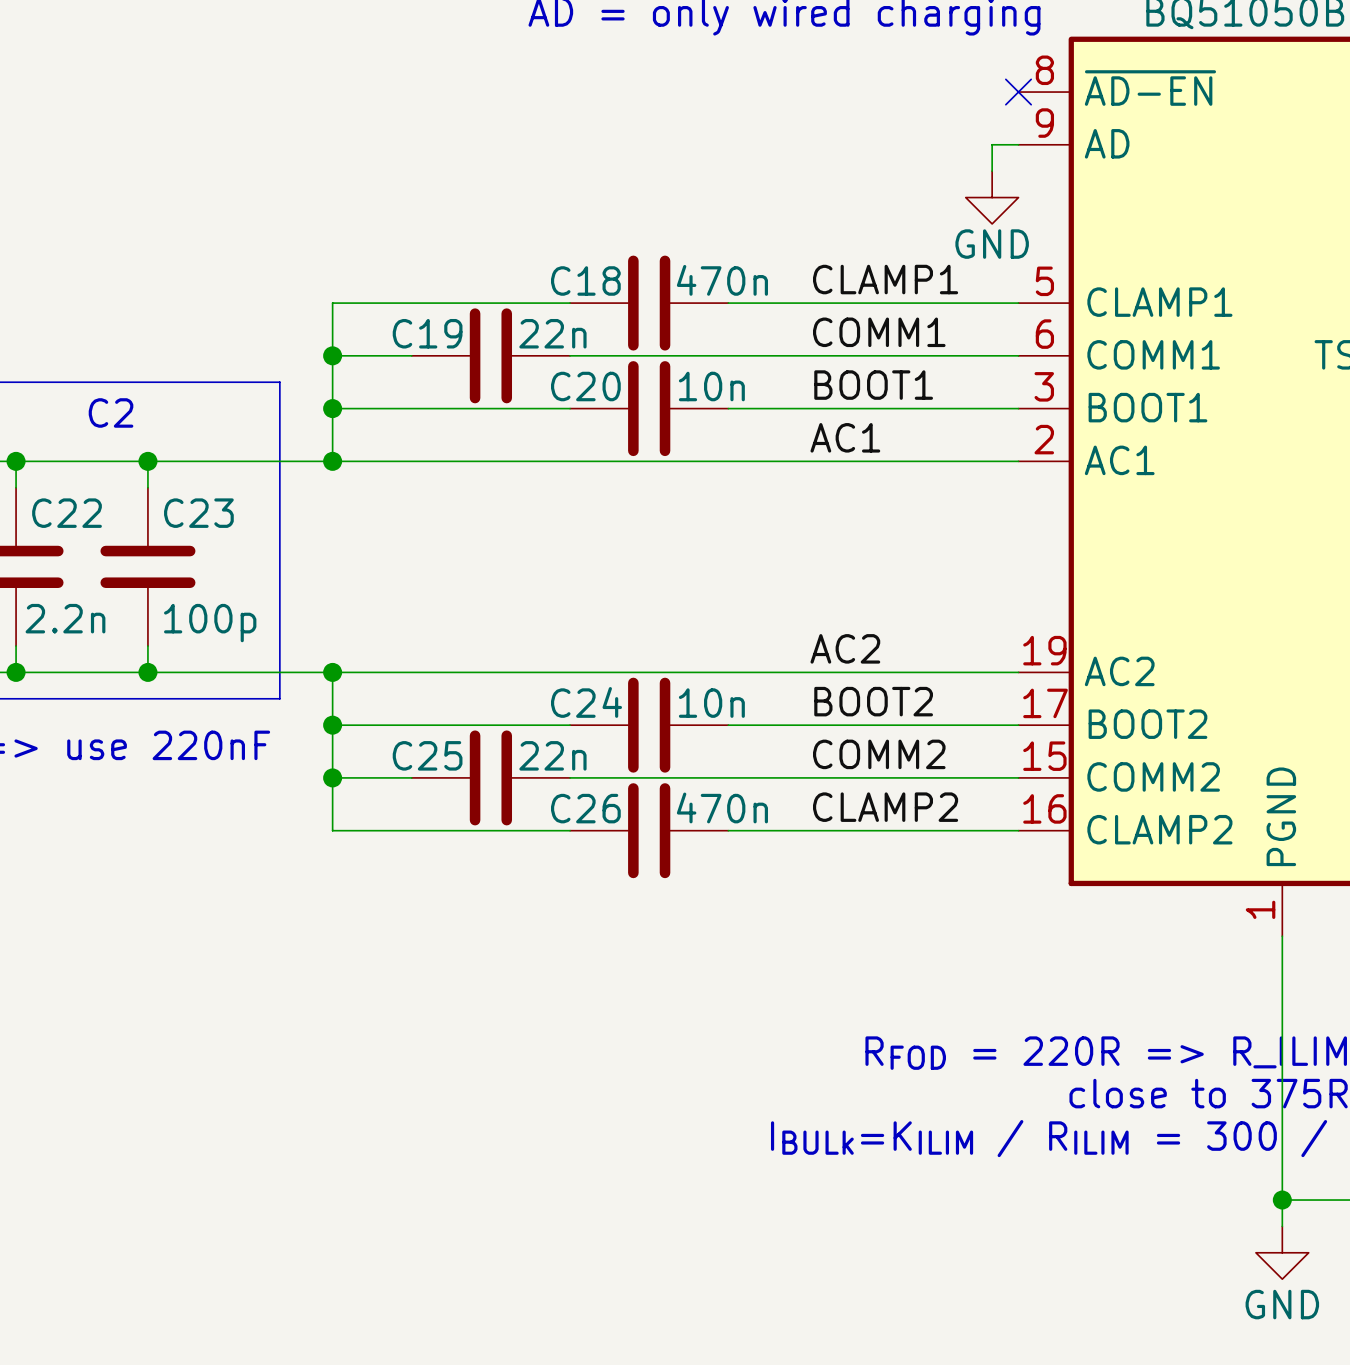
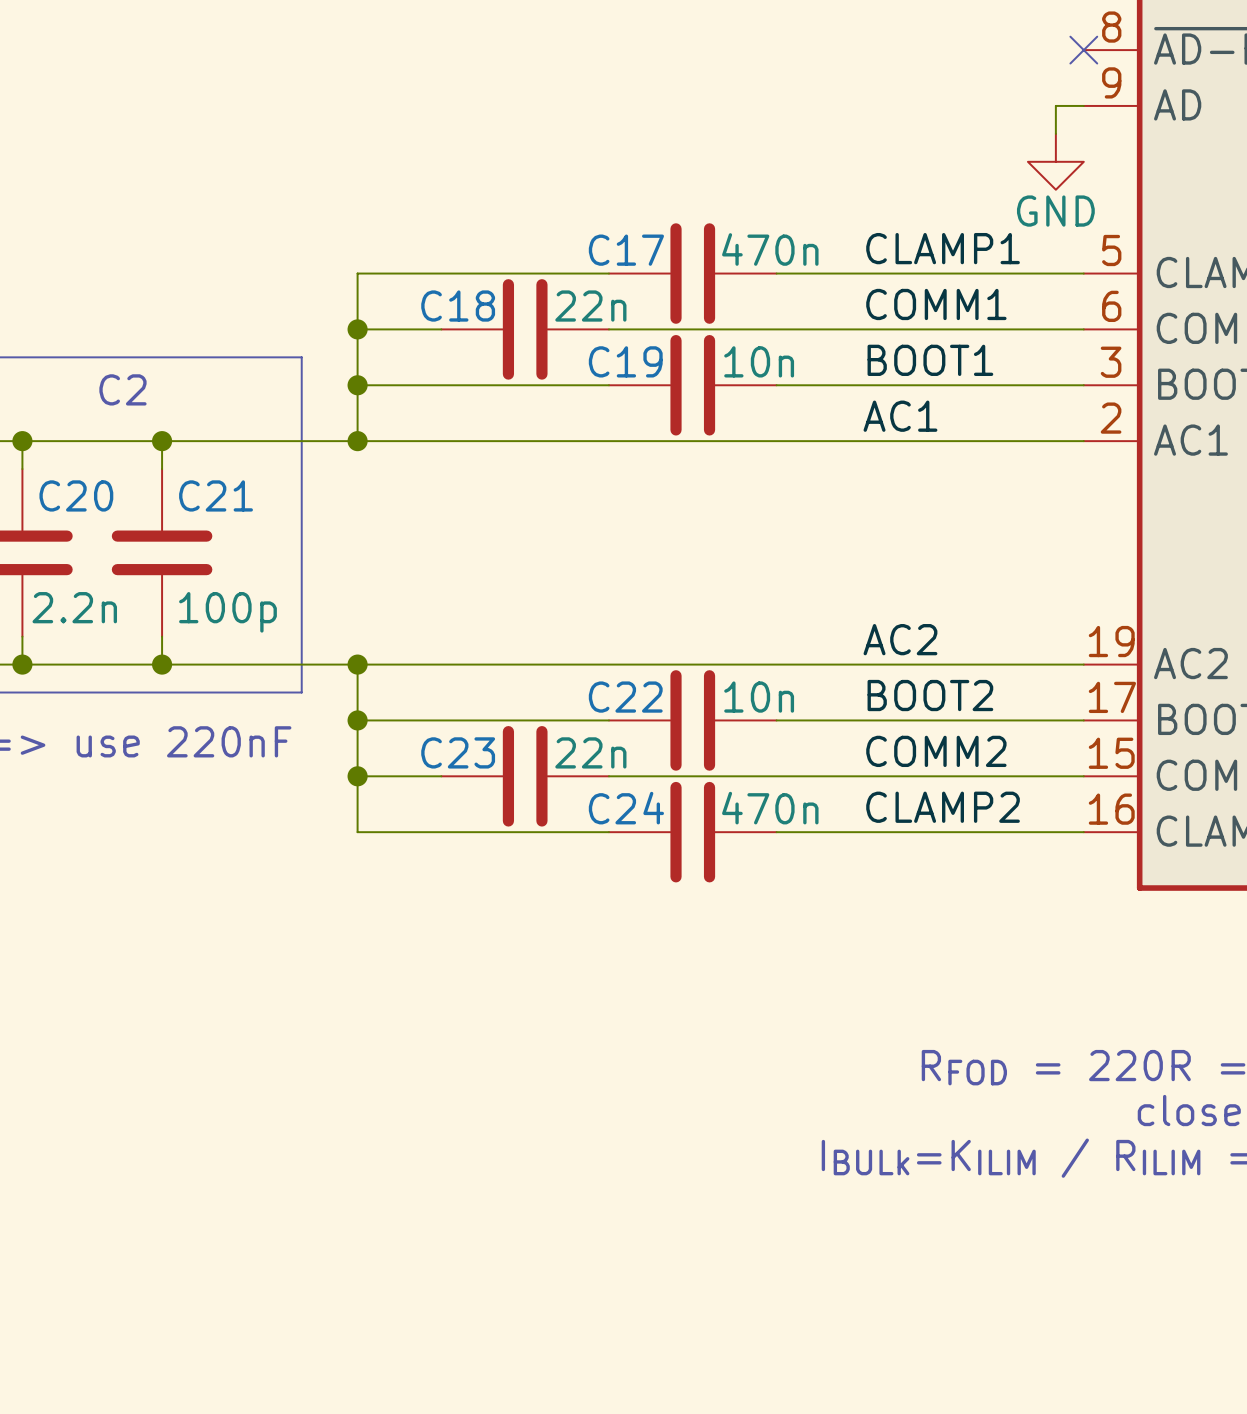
C18 name: C18 (585, 280) -> C17 (626, 250)
C19 name: C19 (427, 333) -> C18 (458, 306)
C20 name: C20 (585, 386) -> C19 (625, 361)
C22 name: C22 (67, 513) -> C20 (76, 495)
C23 name: C23 (198, 513) -> C21 (216, 495)
C24 name: C24 (586, 702) -> C22 (625, 697)
C25 name: C25 (427, 755) -> C23 (458, 752)
C26 name: C26 (585, 808) -> C24 (626, 808)

